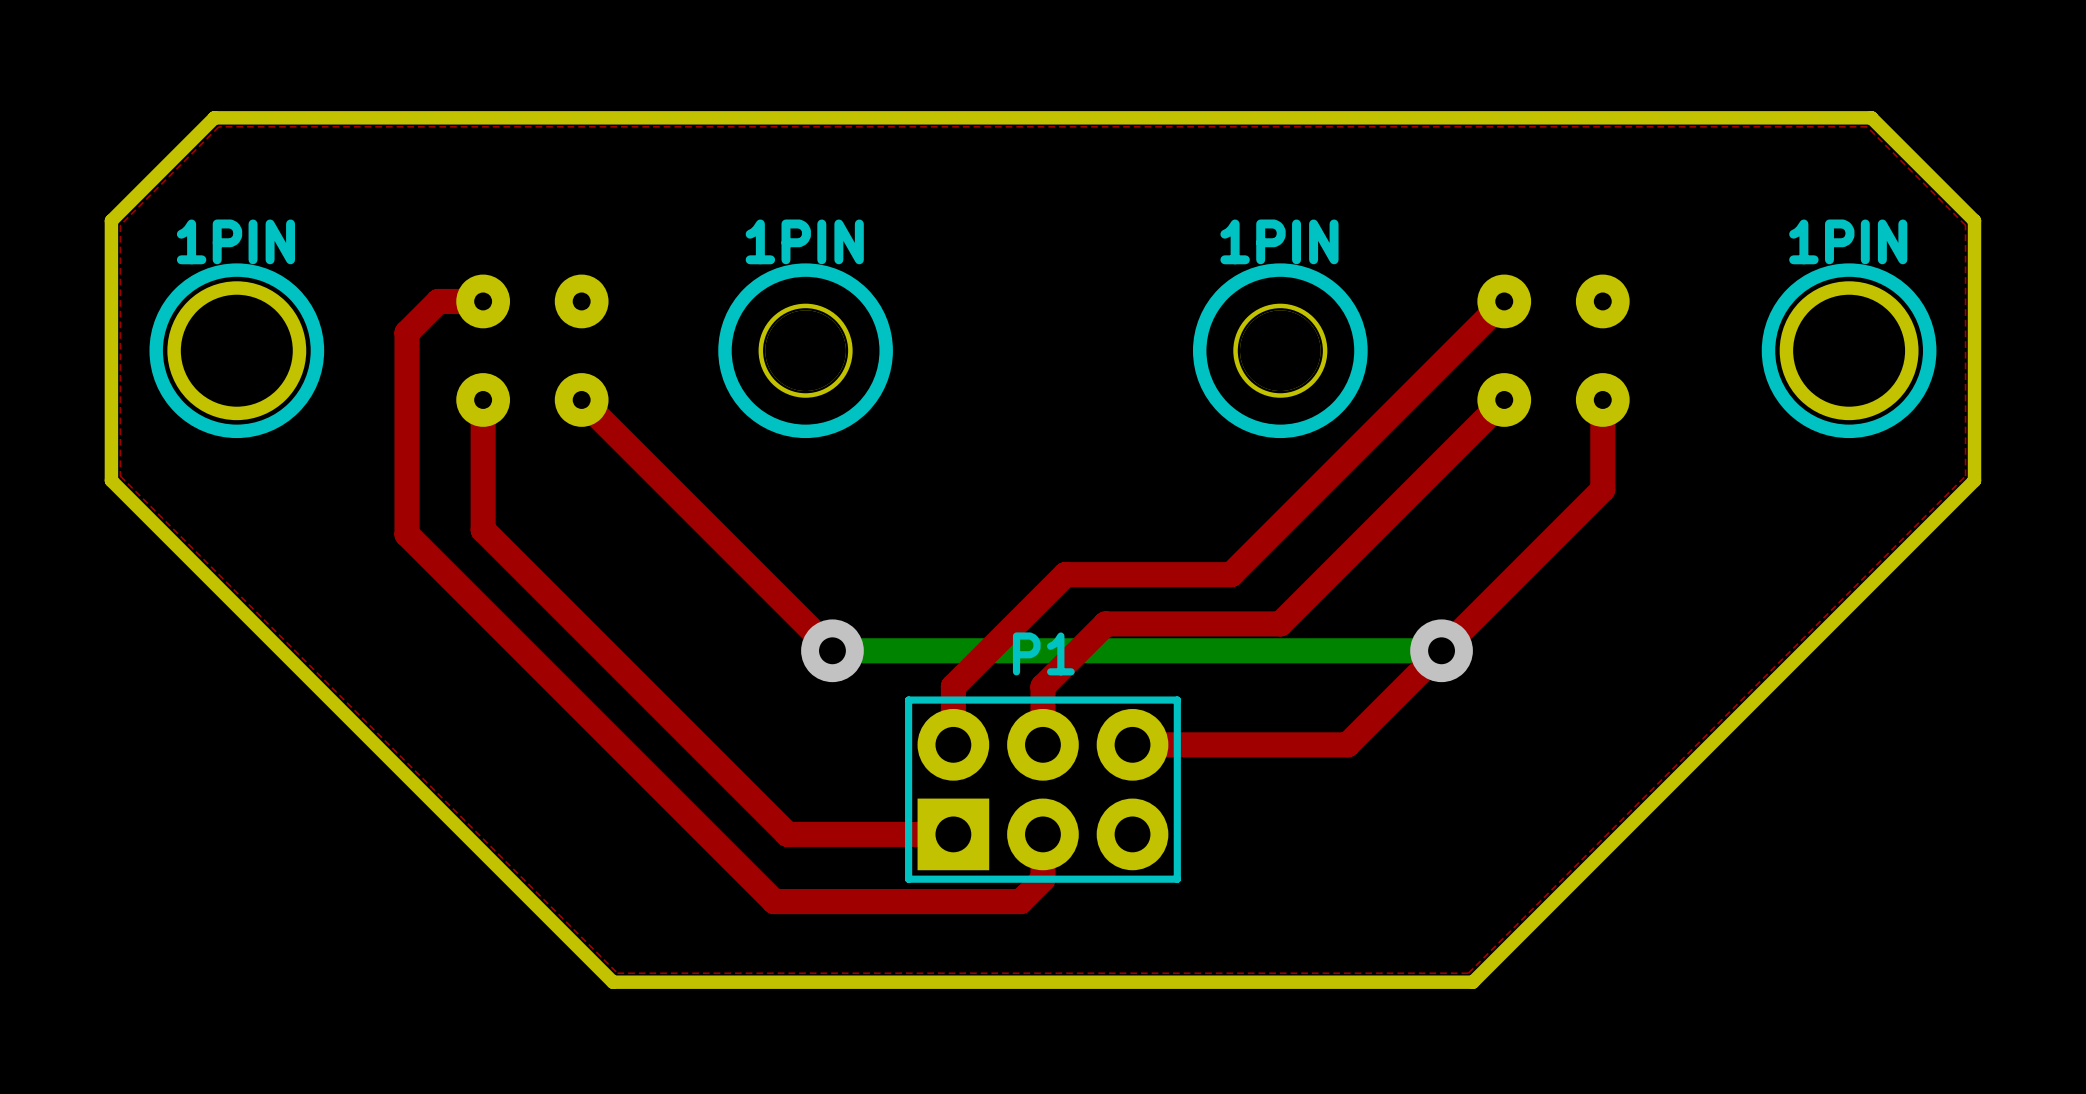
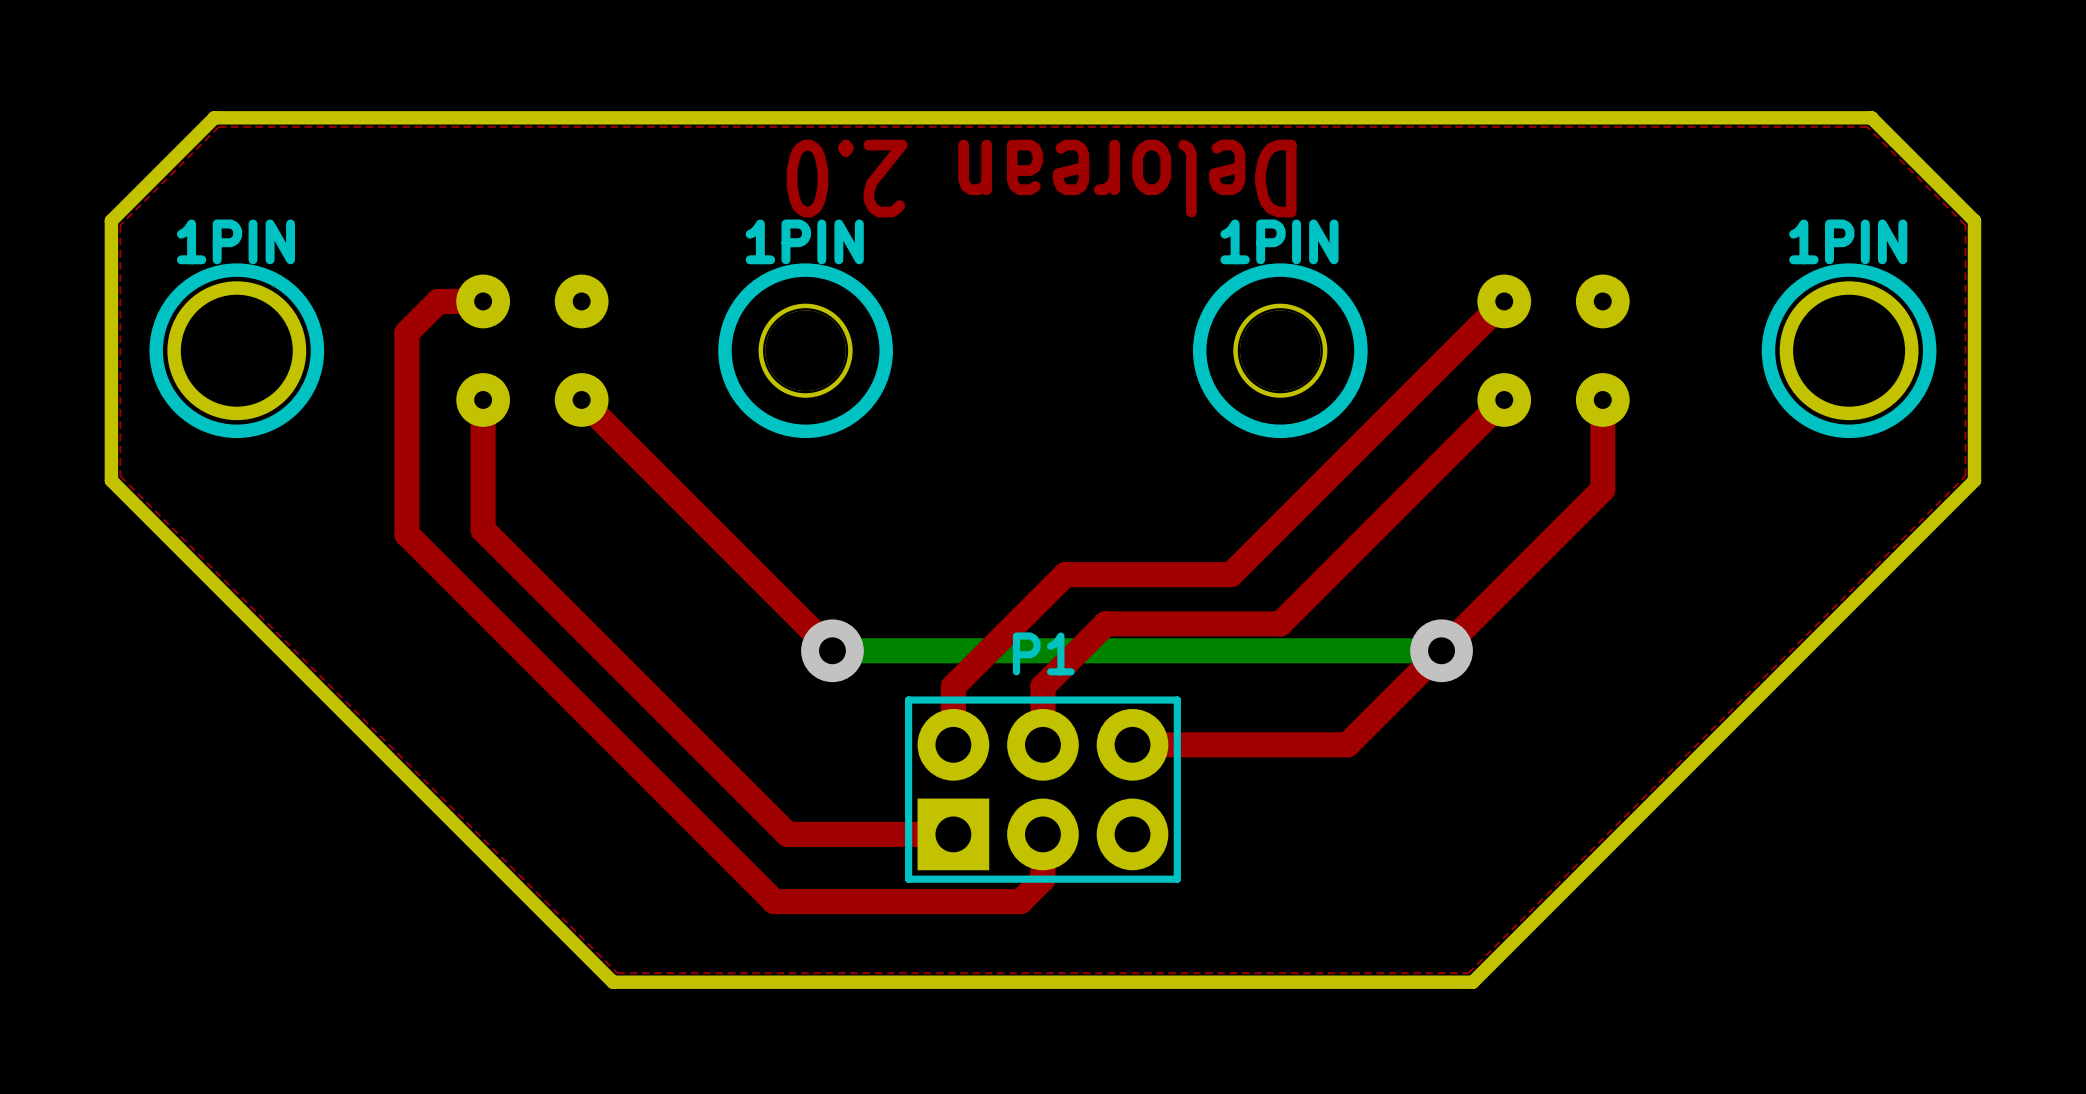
text: none -> Delorean 2.0 (1041, 178)

